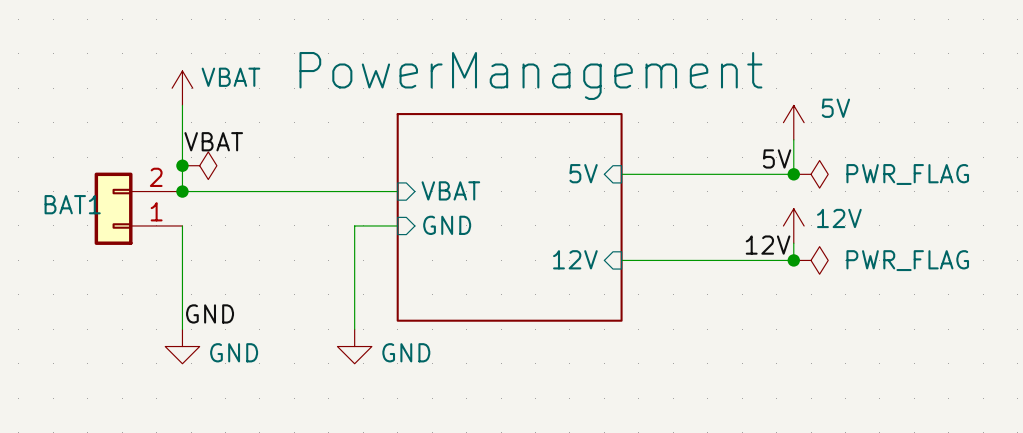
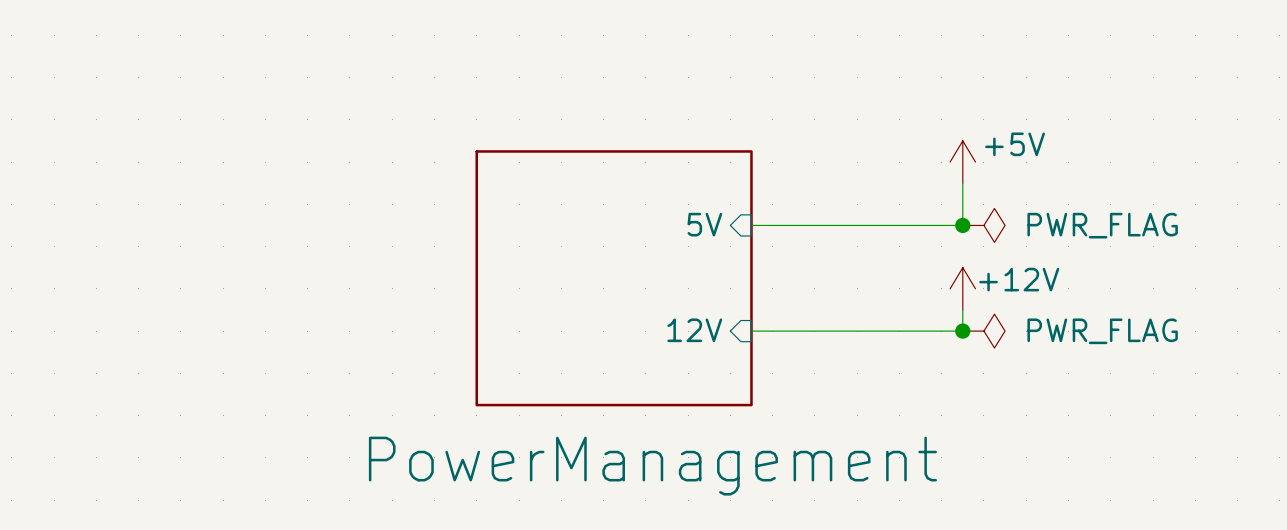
sheet PowerManagement name position: PowerManagement (530, 75) -> PowerManagement (652, 466)
power symbol: VBAT (182, 88) -> none
wire: (182, 105) (182, 191) (397, 191) -> none
power symbol: 5V (793, 122) -> +5V (962, 162)
label: VBAT (213, 141) -> none
label: 5V (777, 158) -> none
junction: (182, 165) -> none
power symbol: (199, 165) -> none
sheet pin: VBAT (450, 190) -> none
junction: (182, 191) -> none
BAT1: (138, 208) -> none
wire: (182, 225) (182, 329) -> none
wire: (397, 225) (354, 225) (354, 329) -> none
sheet pin: GND (447, 225) -> none
power symbol: 12V (793, 225) -> +12V (962, 288)
label: 12V (768, 245) -> none
label: GND (210, 313) -> none
power symbol: GND (182, 346) -> none
power symbol: GND (354, 346) -> none

